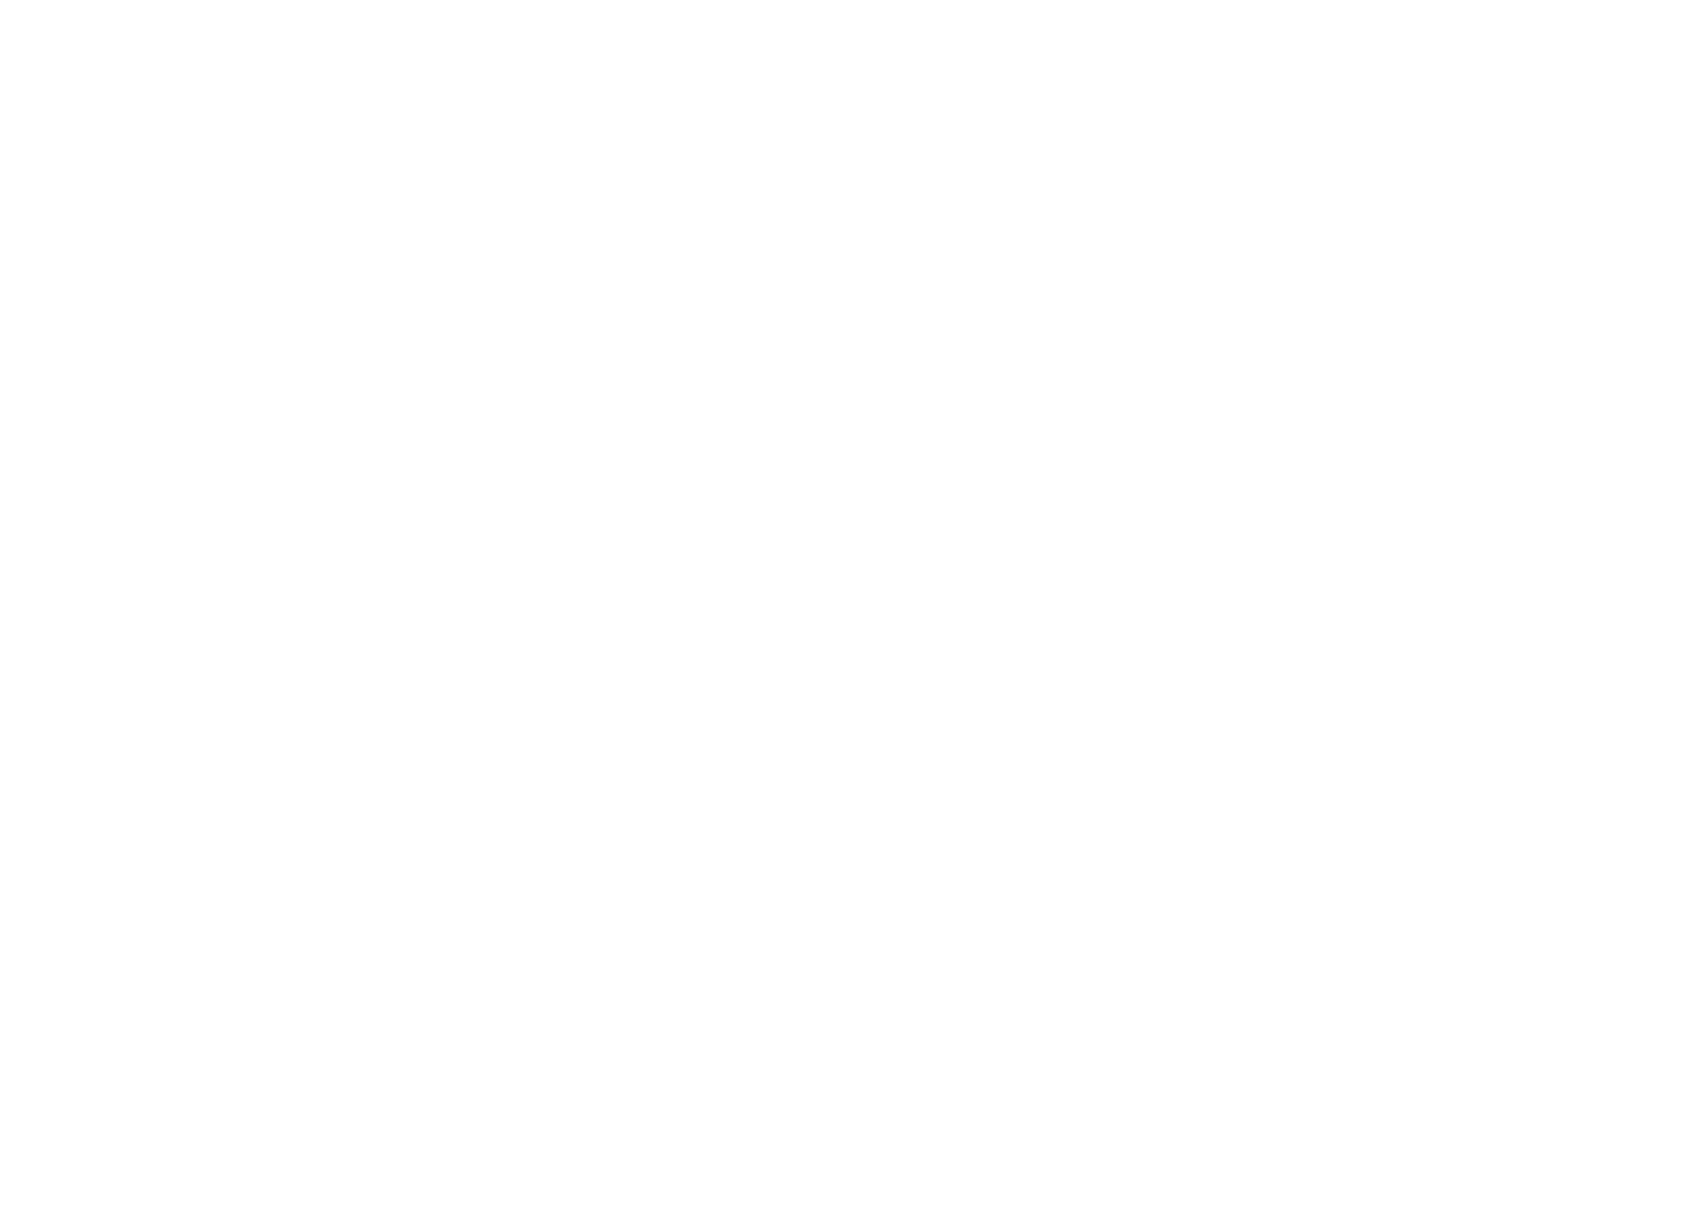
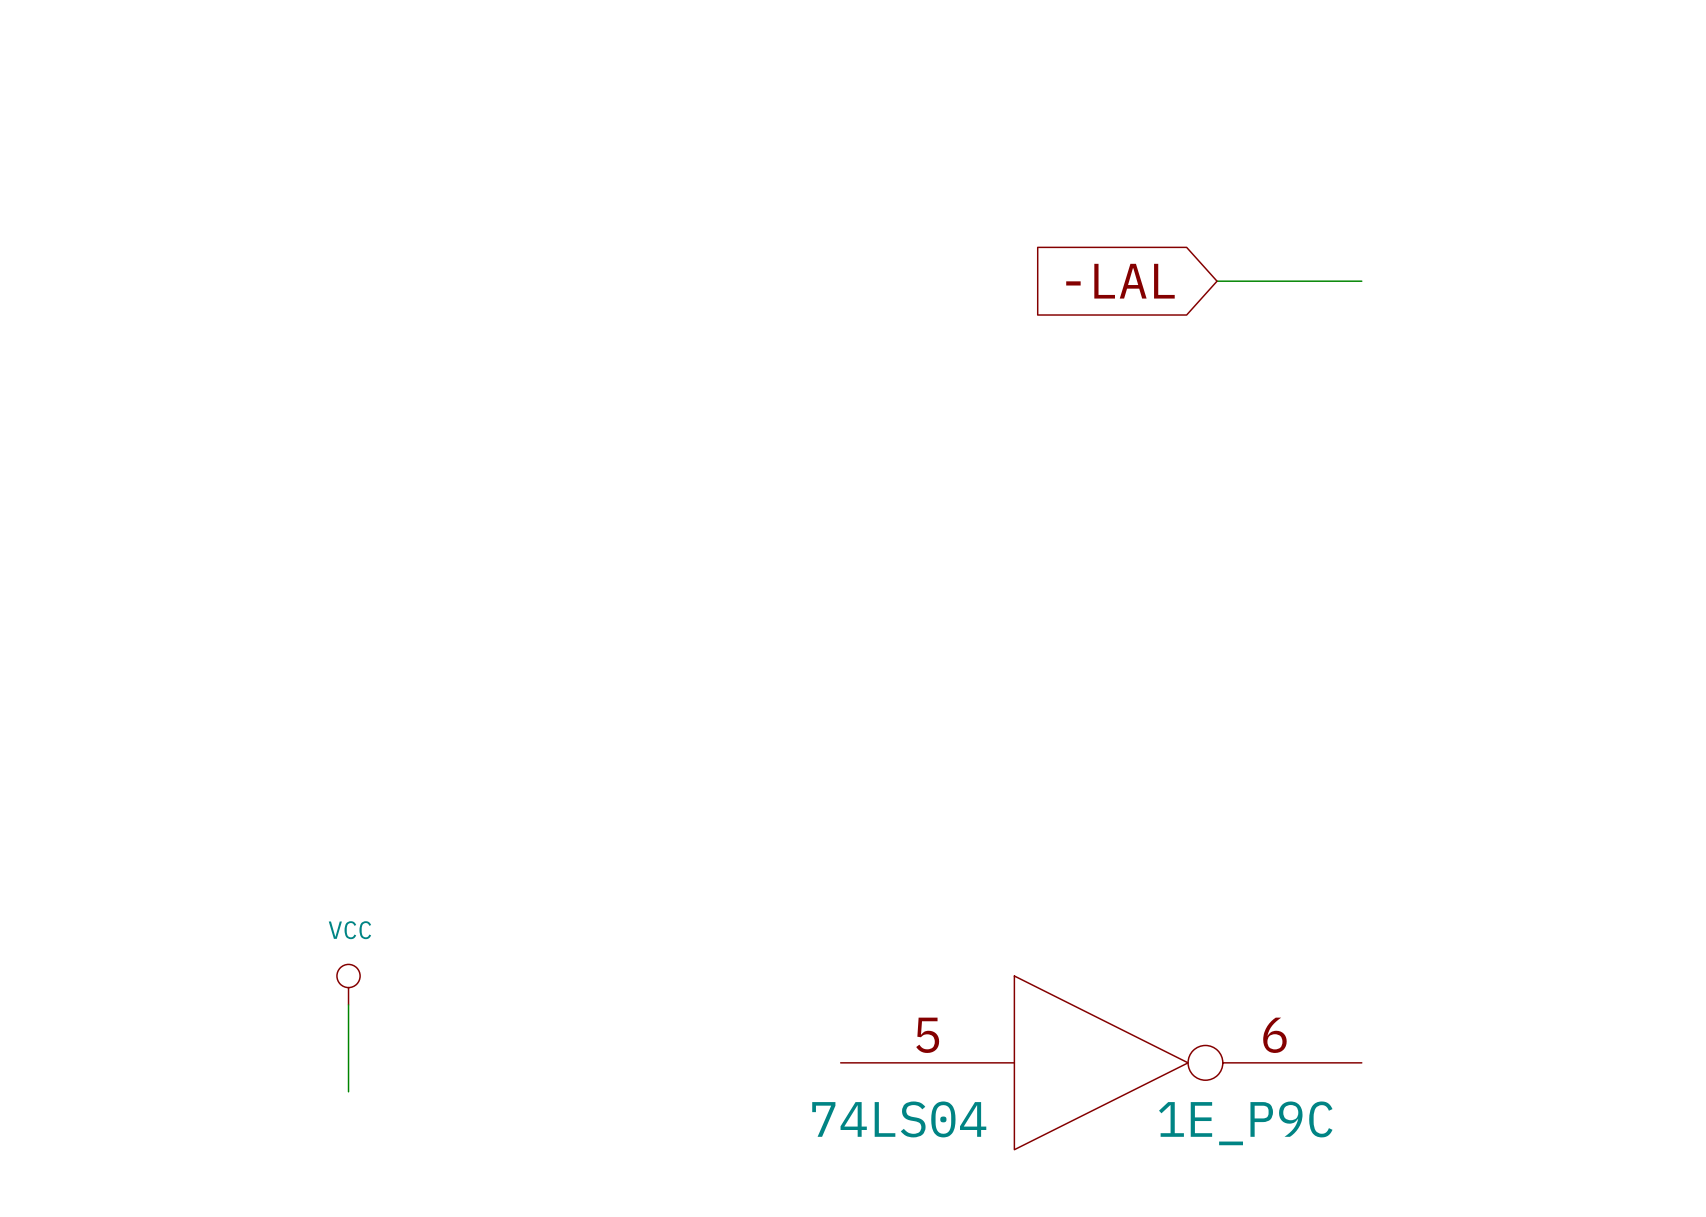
global label: none -> -LAL (1120, 281)
wire: none -> (1217, 281) (1361, 281)
power symbol: none -> VCC (348, 984)
wire: none -> (348, 1004) (348, 1091)
1E_P9C: none -> 74LS04 (1101, 1062)

